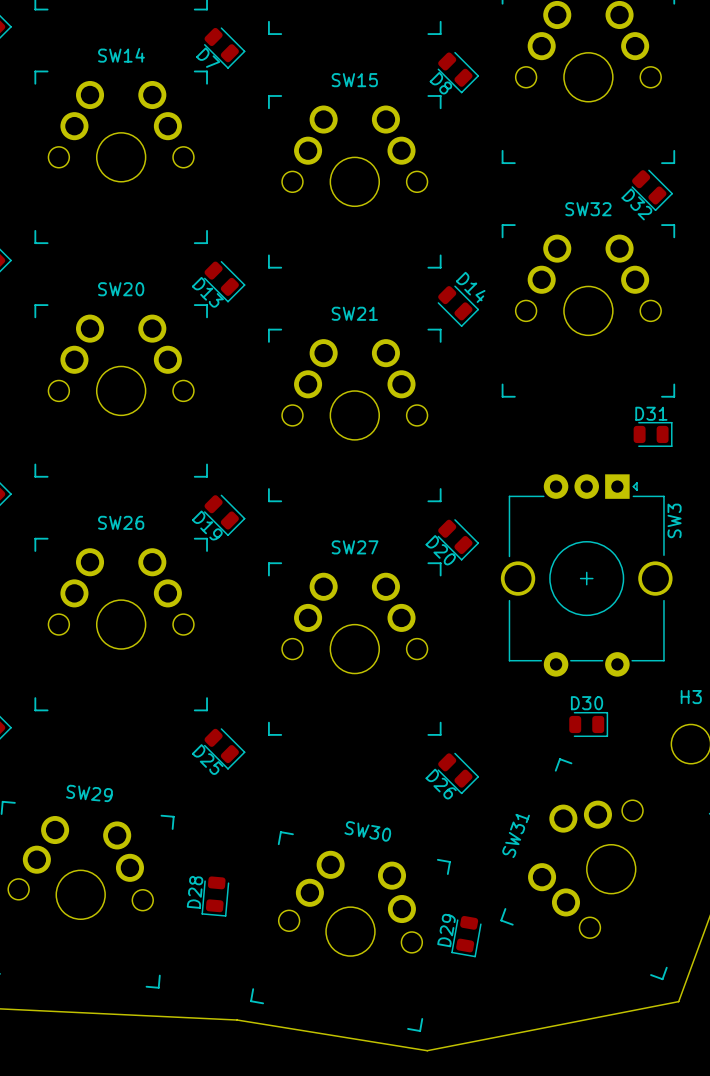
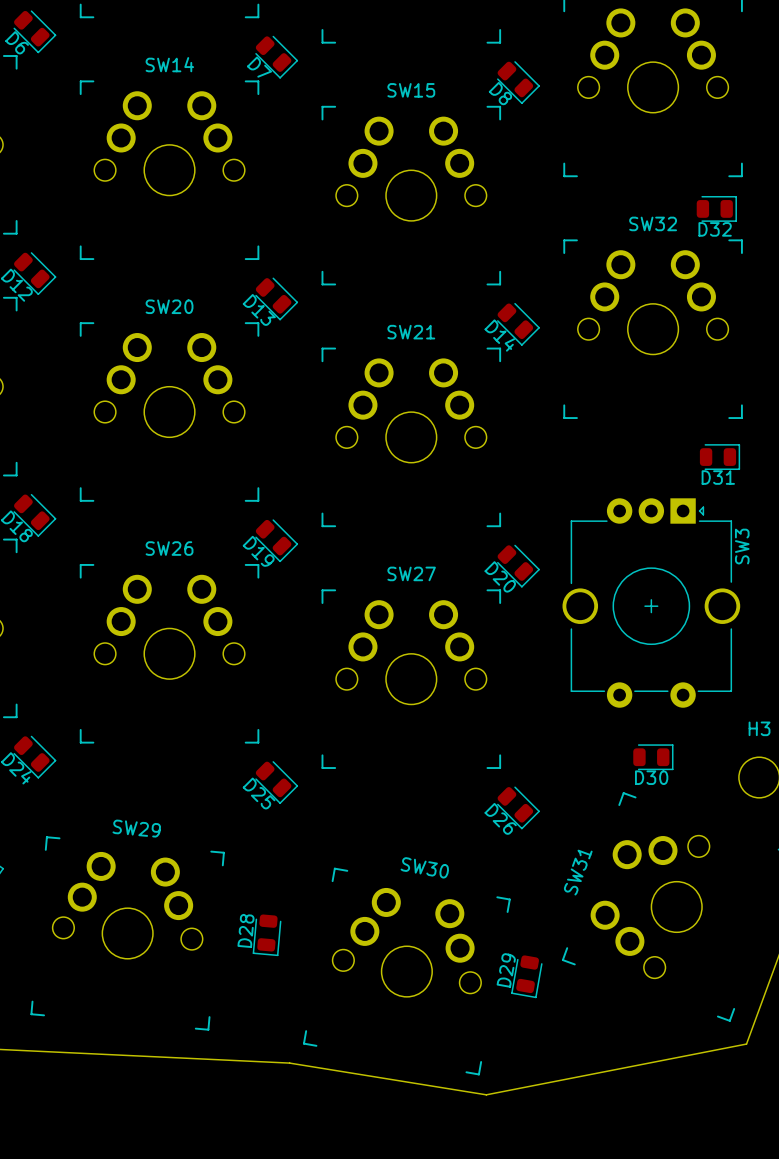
D32 rotation: 0° (652, 190) -> 45° counterclockwise (716, 208)
D14 name position: D14 (470, 287) -> D14 (499, 335)
D31 name position: D31 (651, 413) -> D31 (718, 477)
D30 name position: D30 (587, 703) -> D30 (651, 777)

